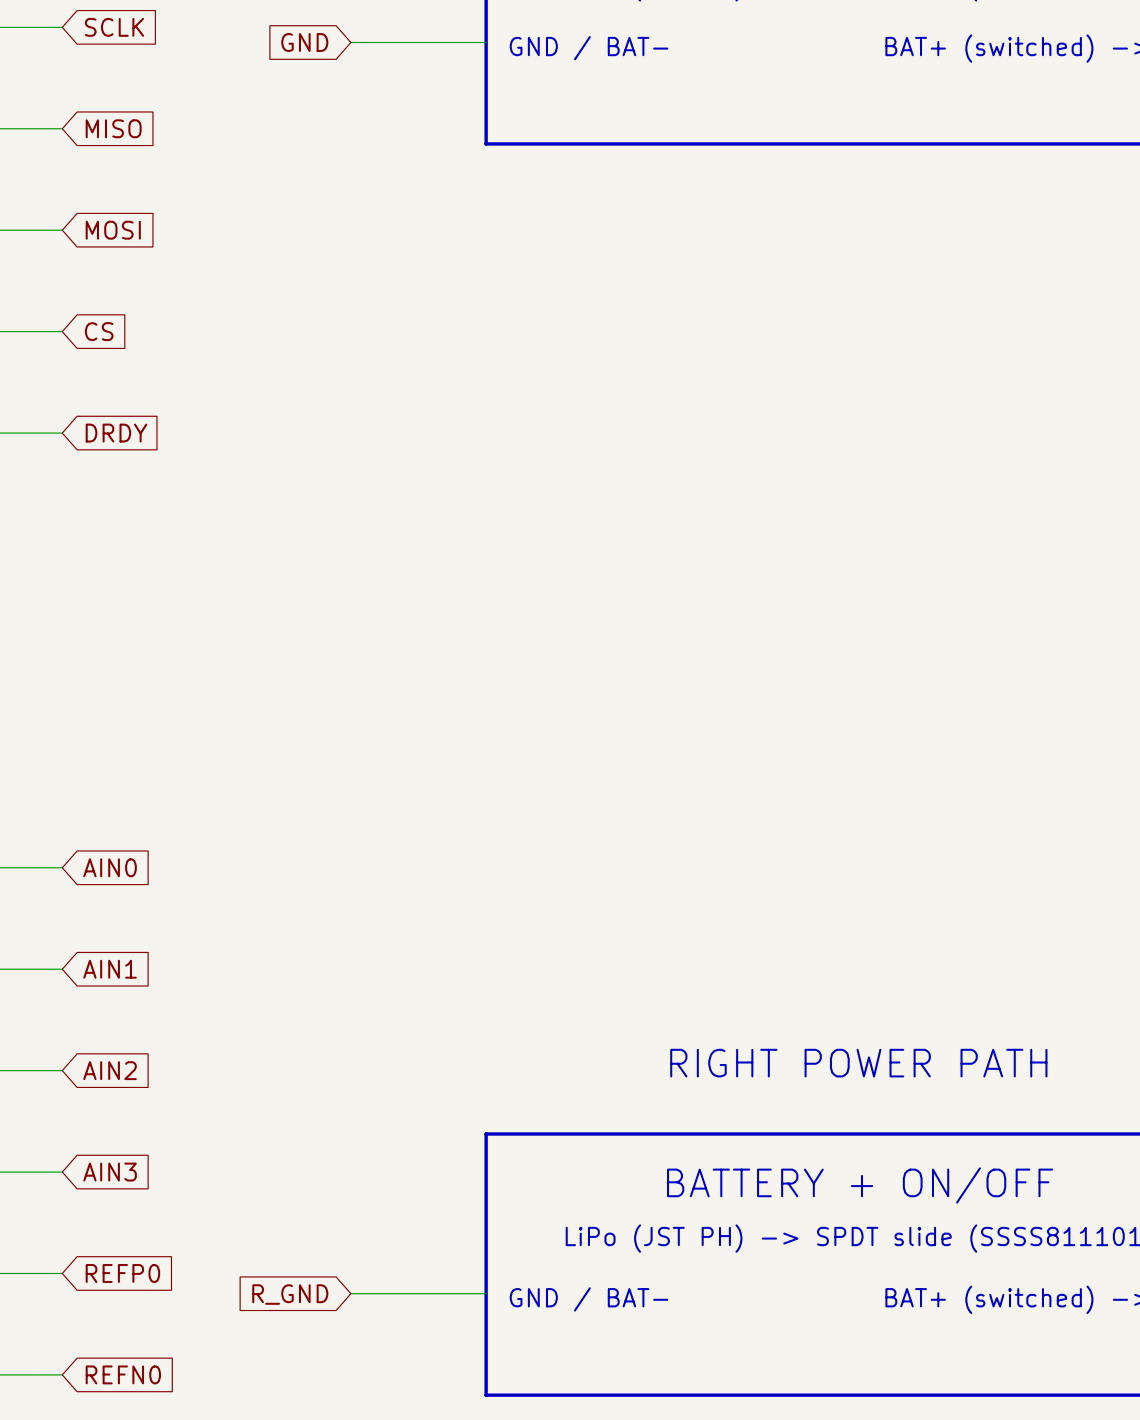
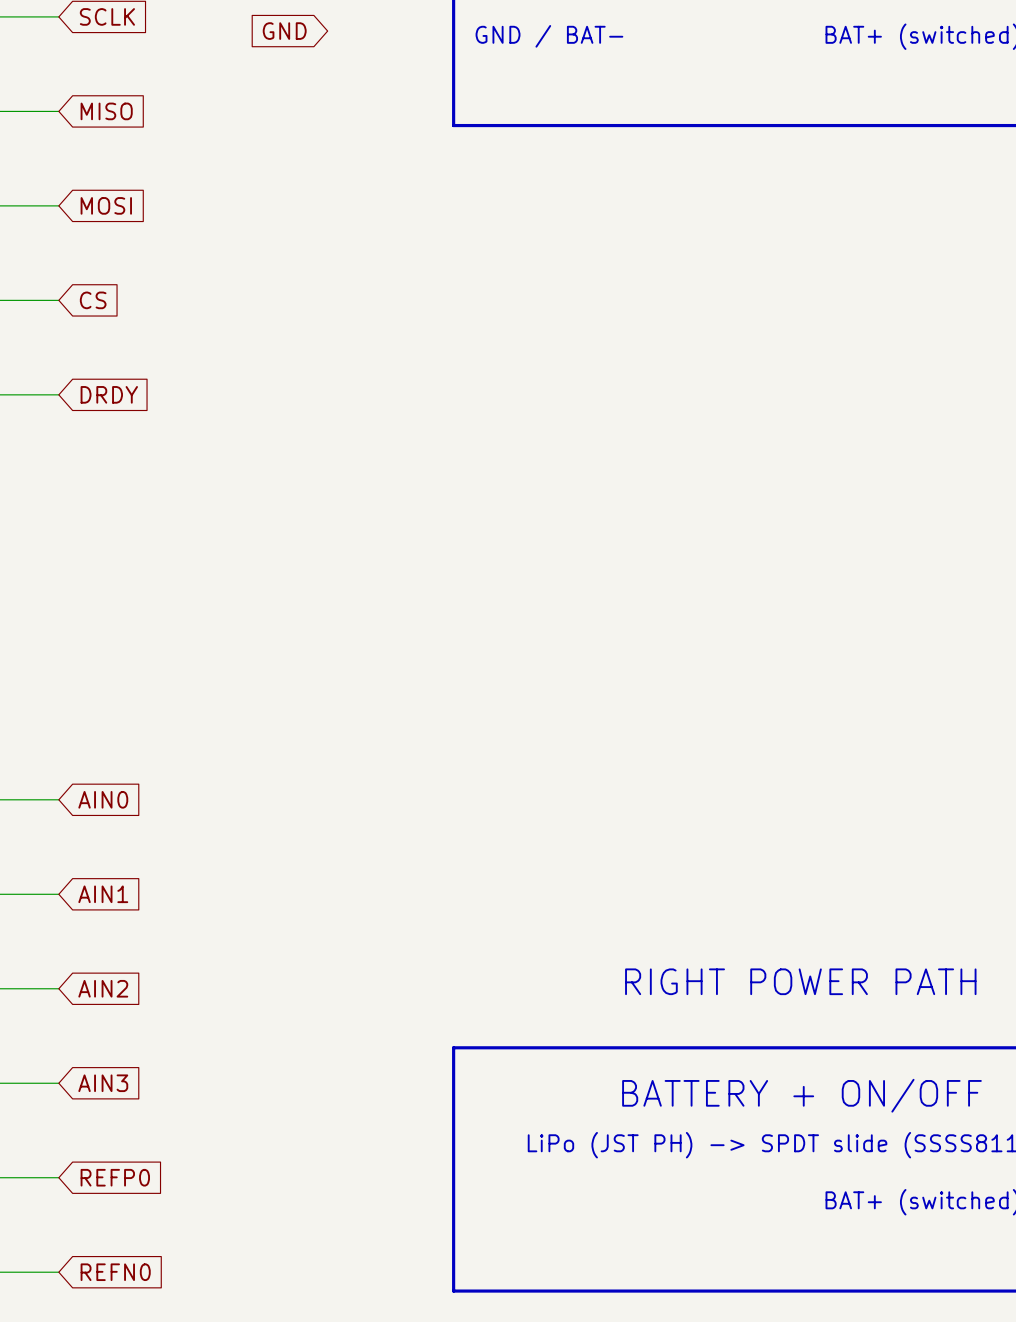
wire: (350, 42) (486, 42) -> none
wire: (350, 1293) (486, 1293) -> none
global label: R_GND (290, 1294) -> none
text: GND / BAT- (589, 1299) -> none

